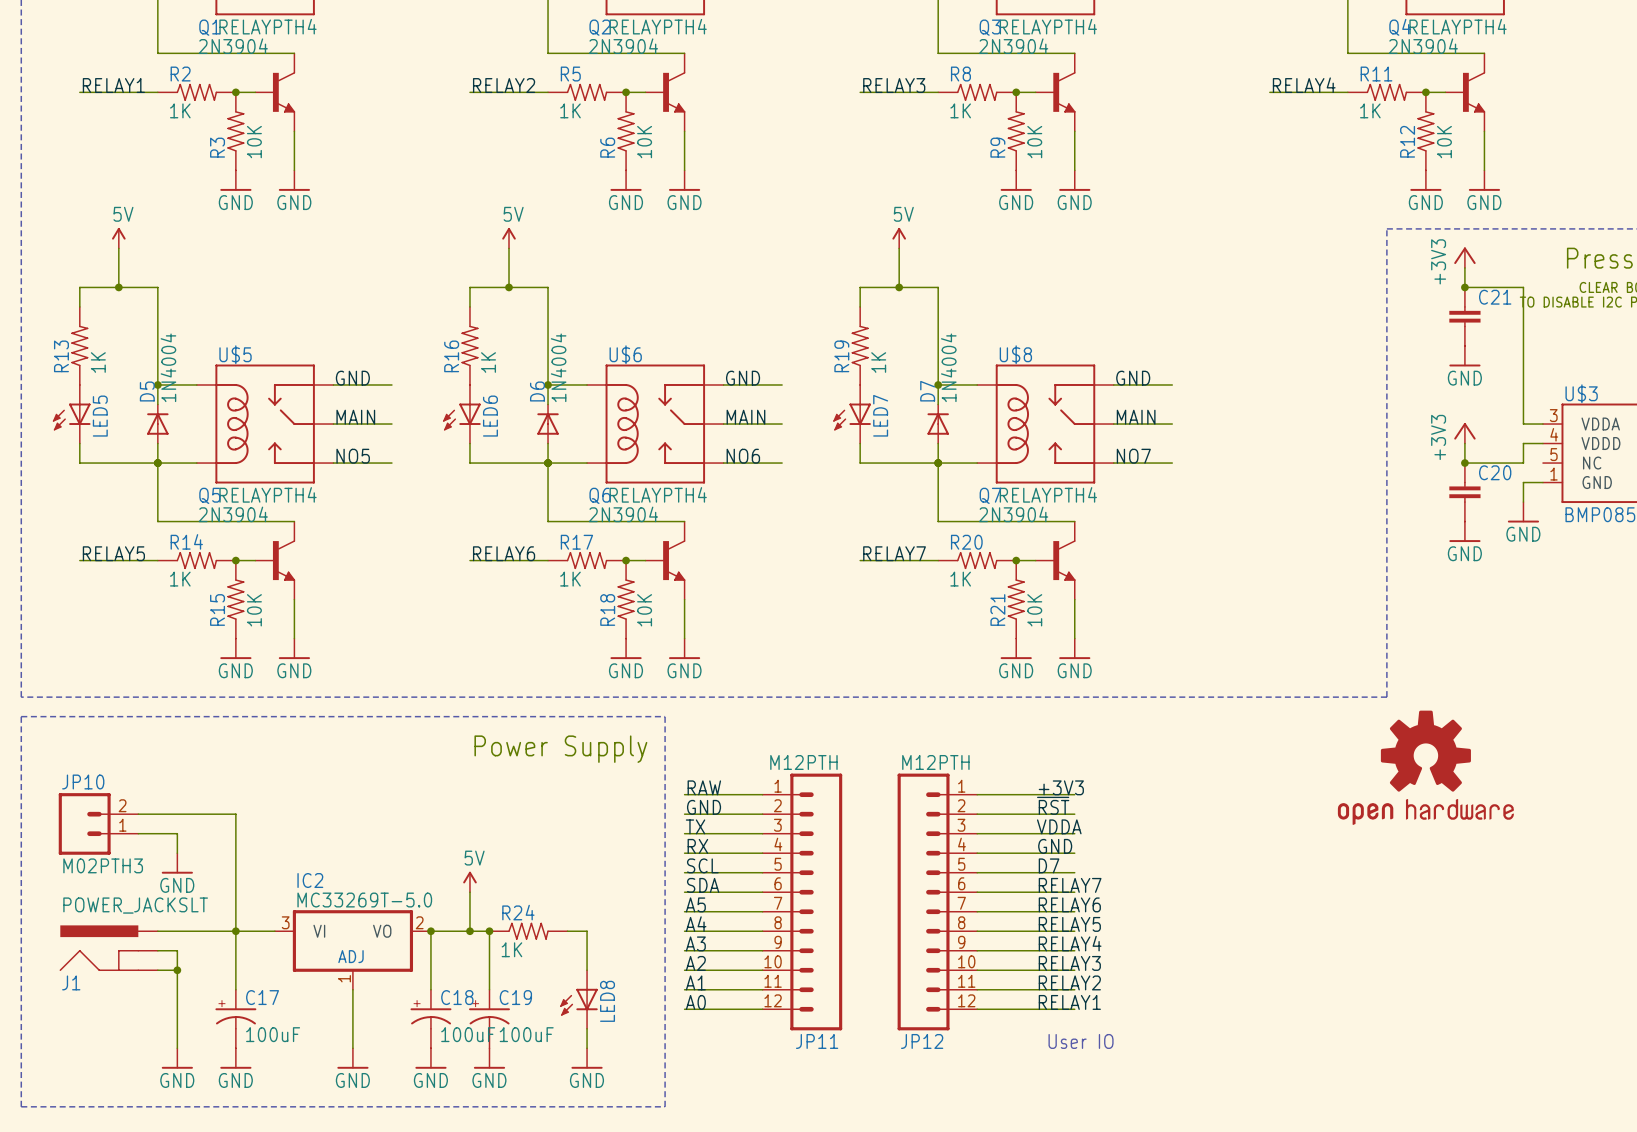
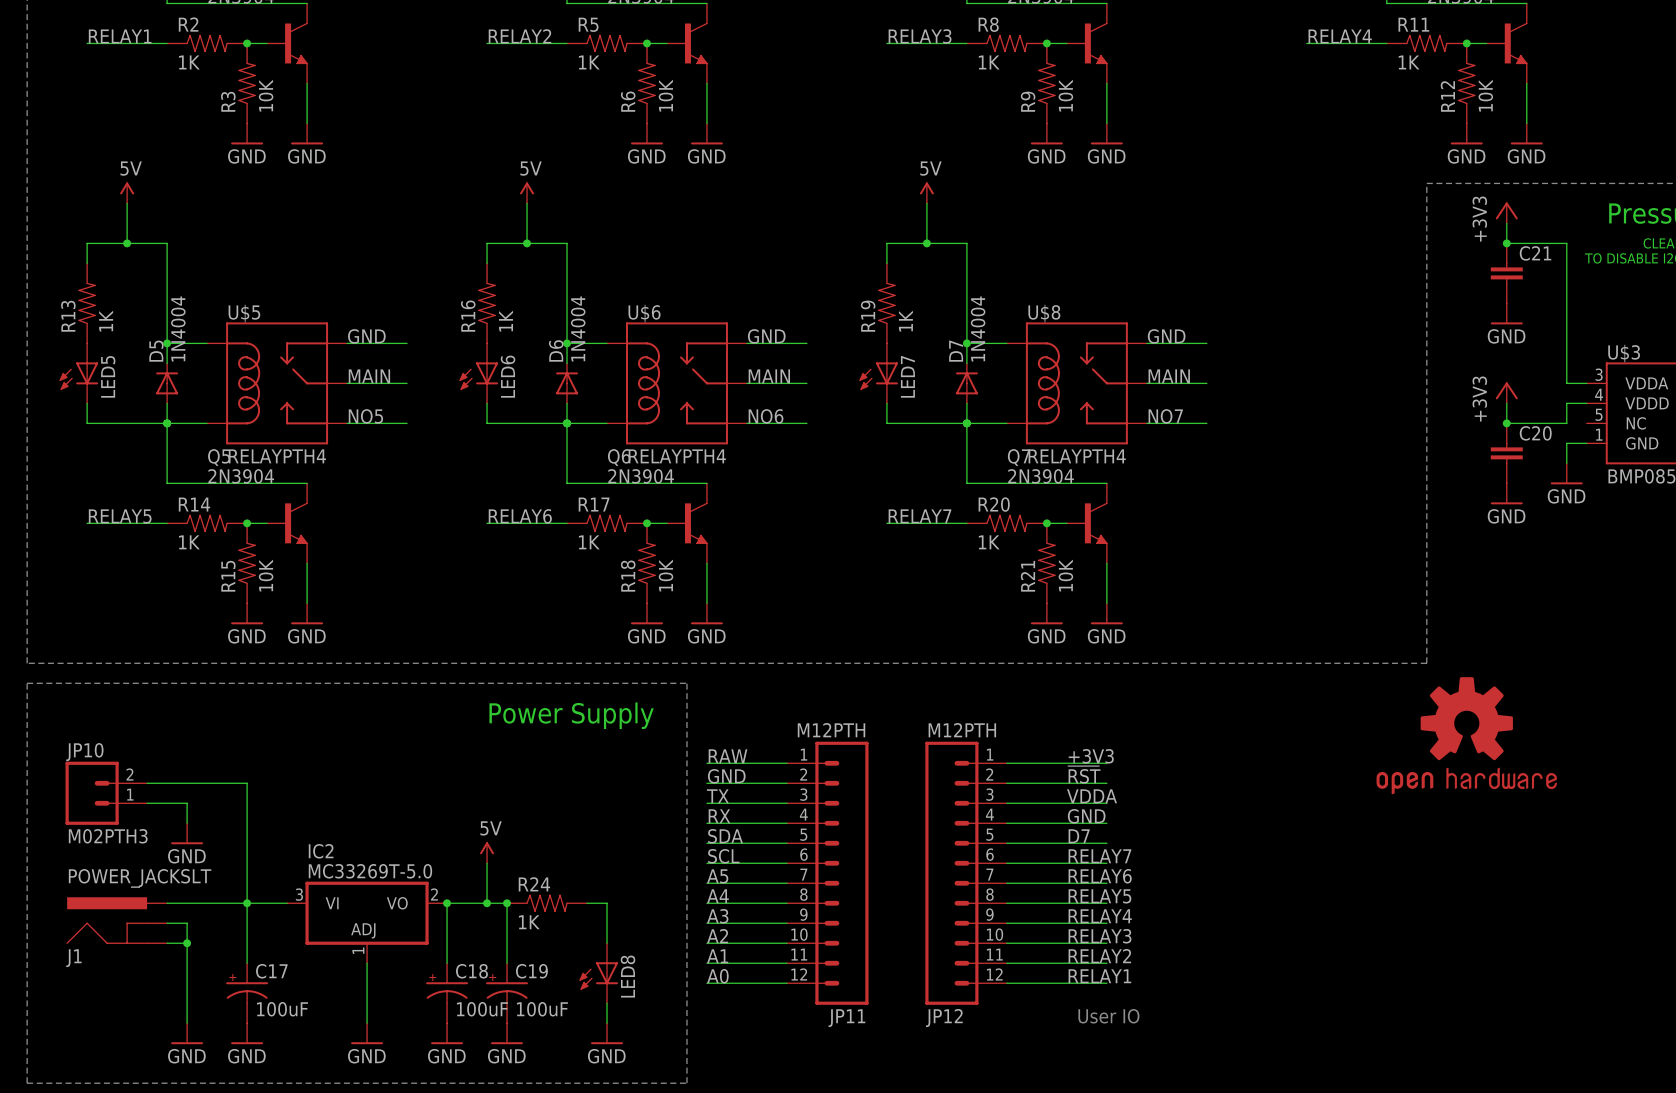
label: SCL (702, 865) -> SDA (725, 836)
label: SDA (703, 885) -> SCL (723, 856)

